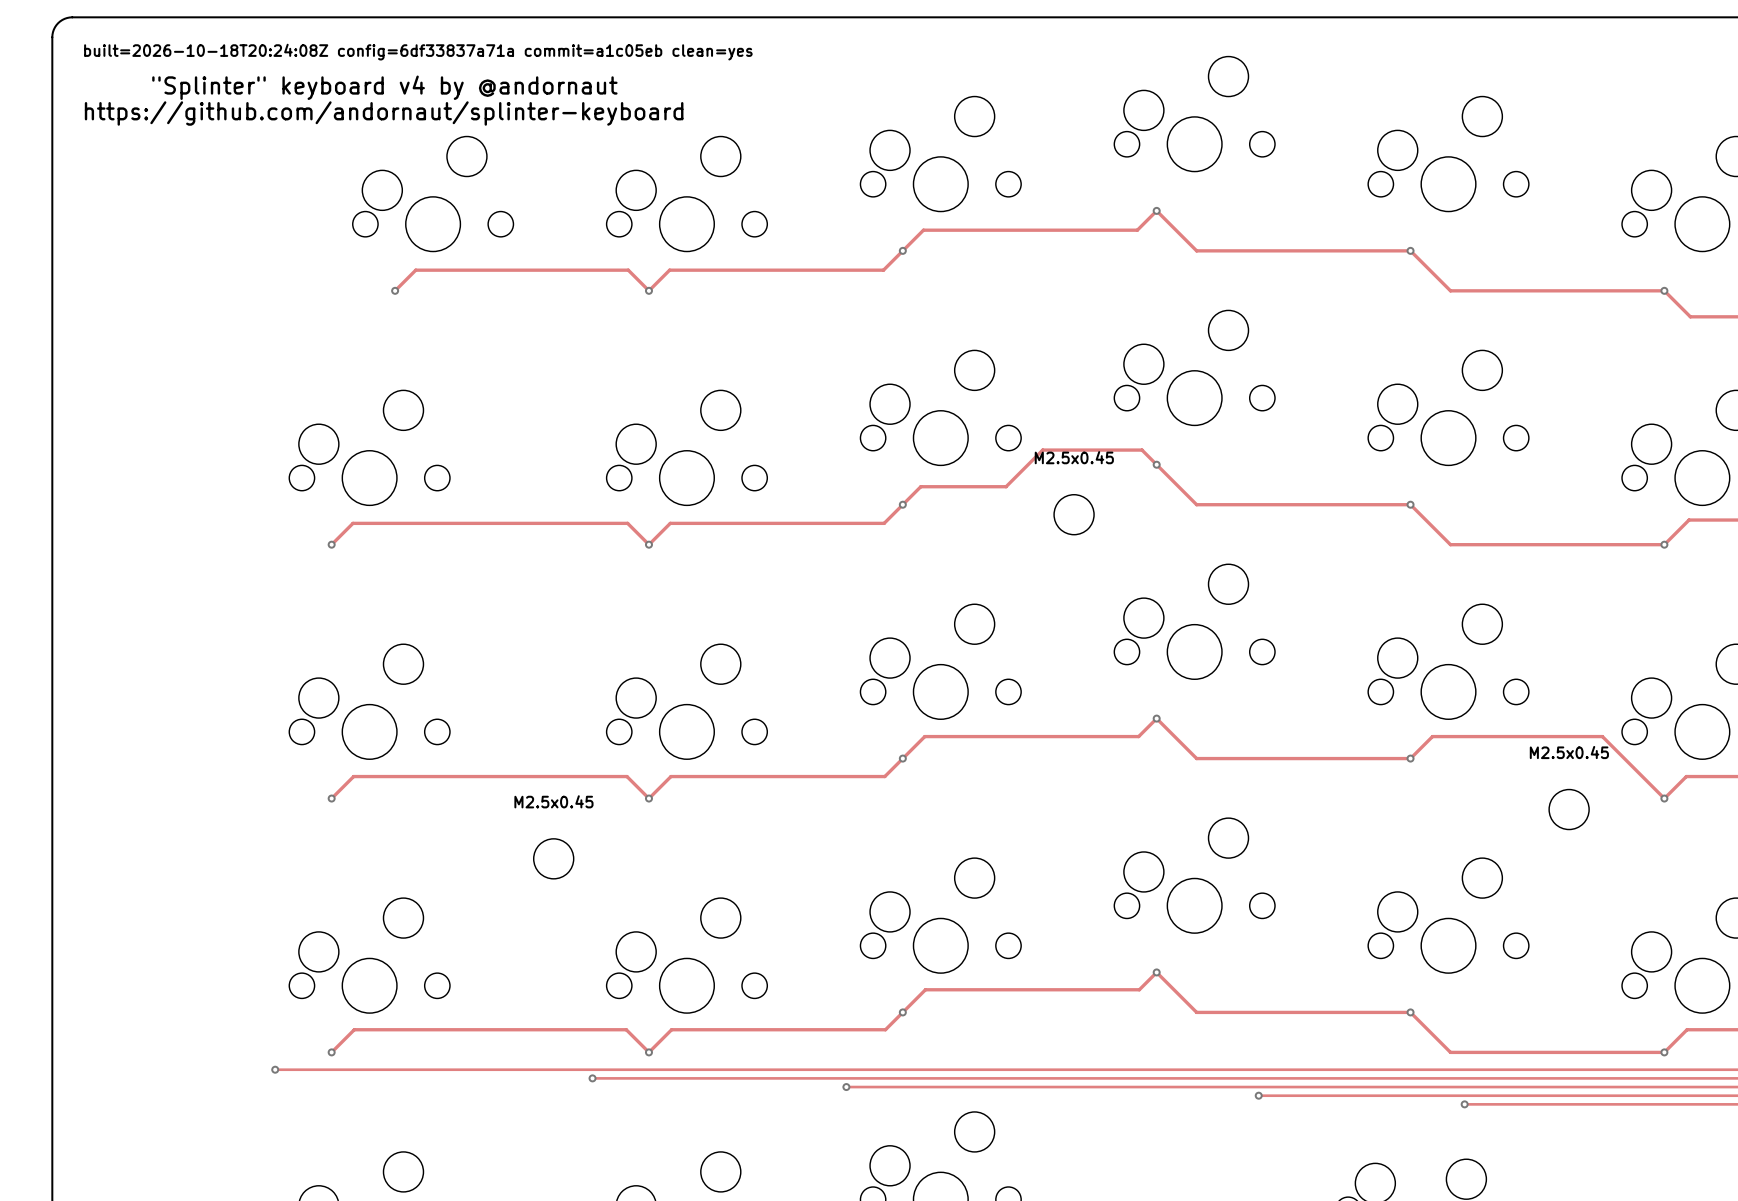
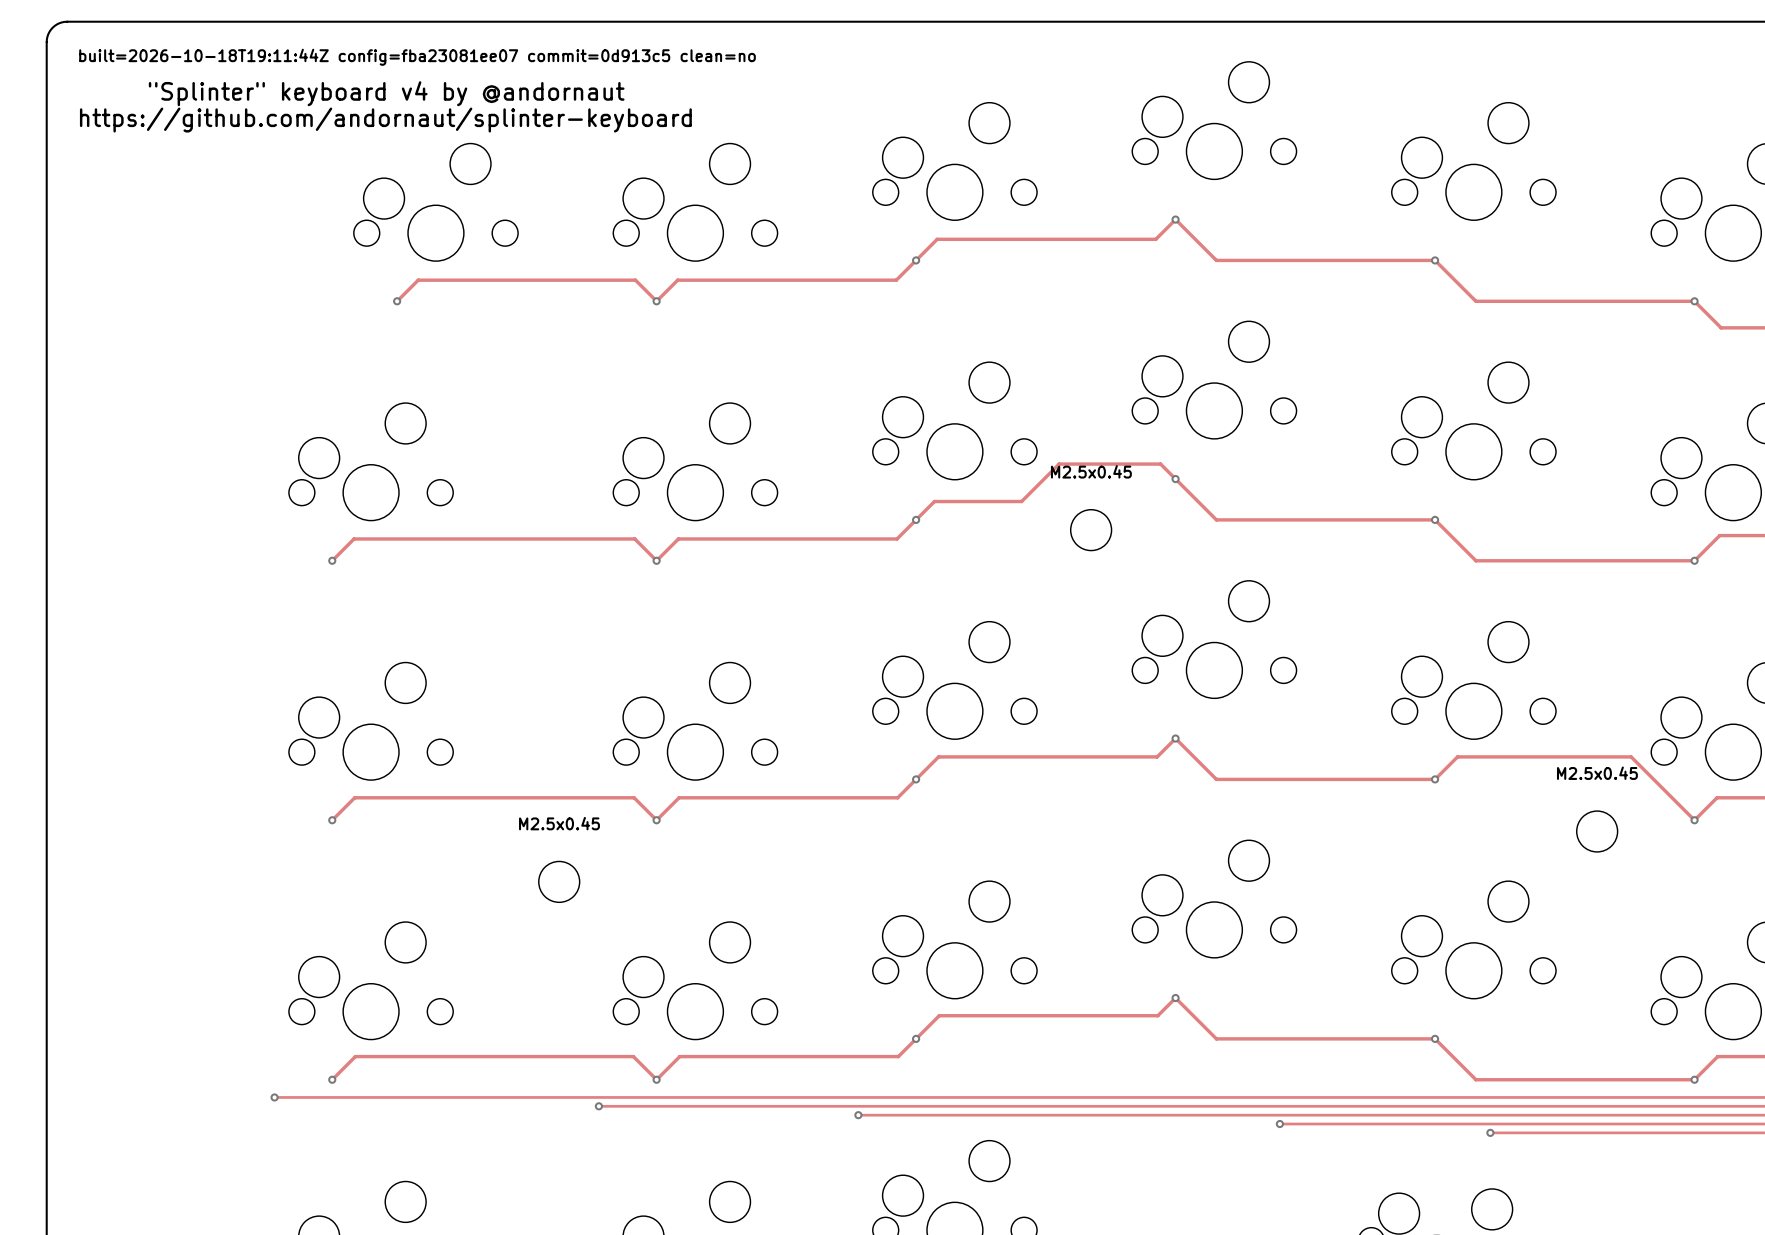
text: built=2026-10-18T20:24:08Z config=6df33837a71a commit=a1c05eb clean=yes (418, 52) -> built=2026-10-18T19:11:44Z config=fba23081ee07 commit=0d913c5 clean=no (417, 57)

